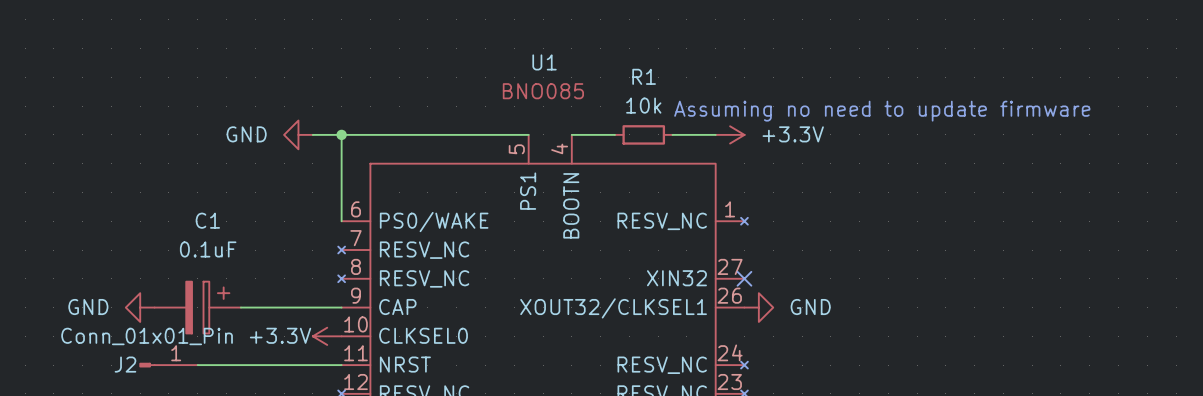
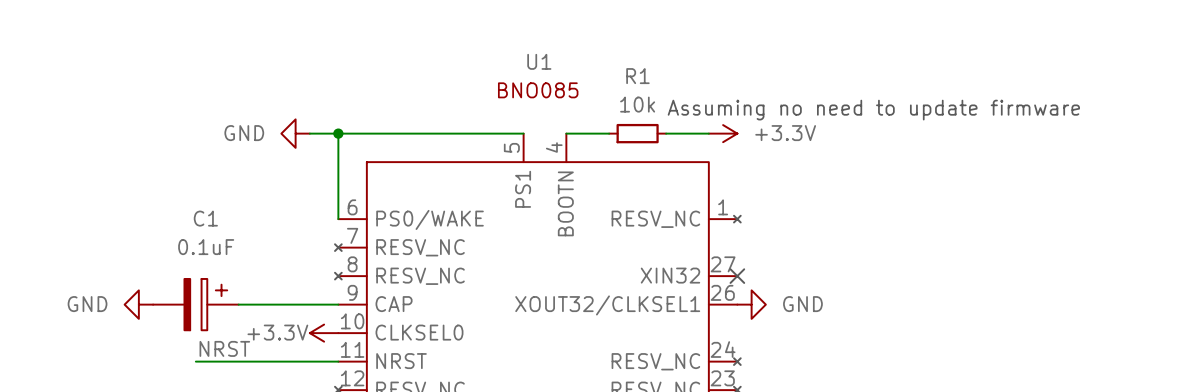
label: none -> NRST (224, 348)
J2: Conn_01x01_Pin (168, 365) -> none

